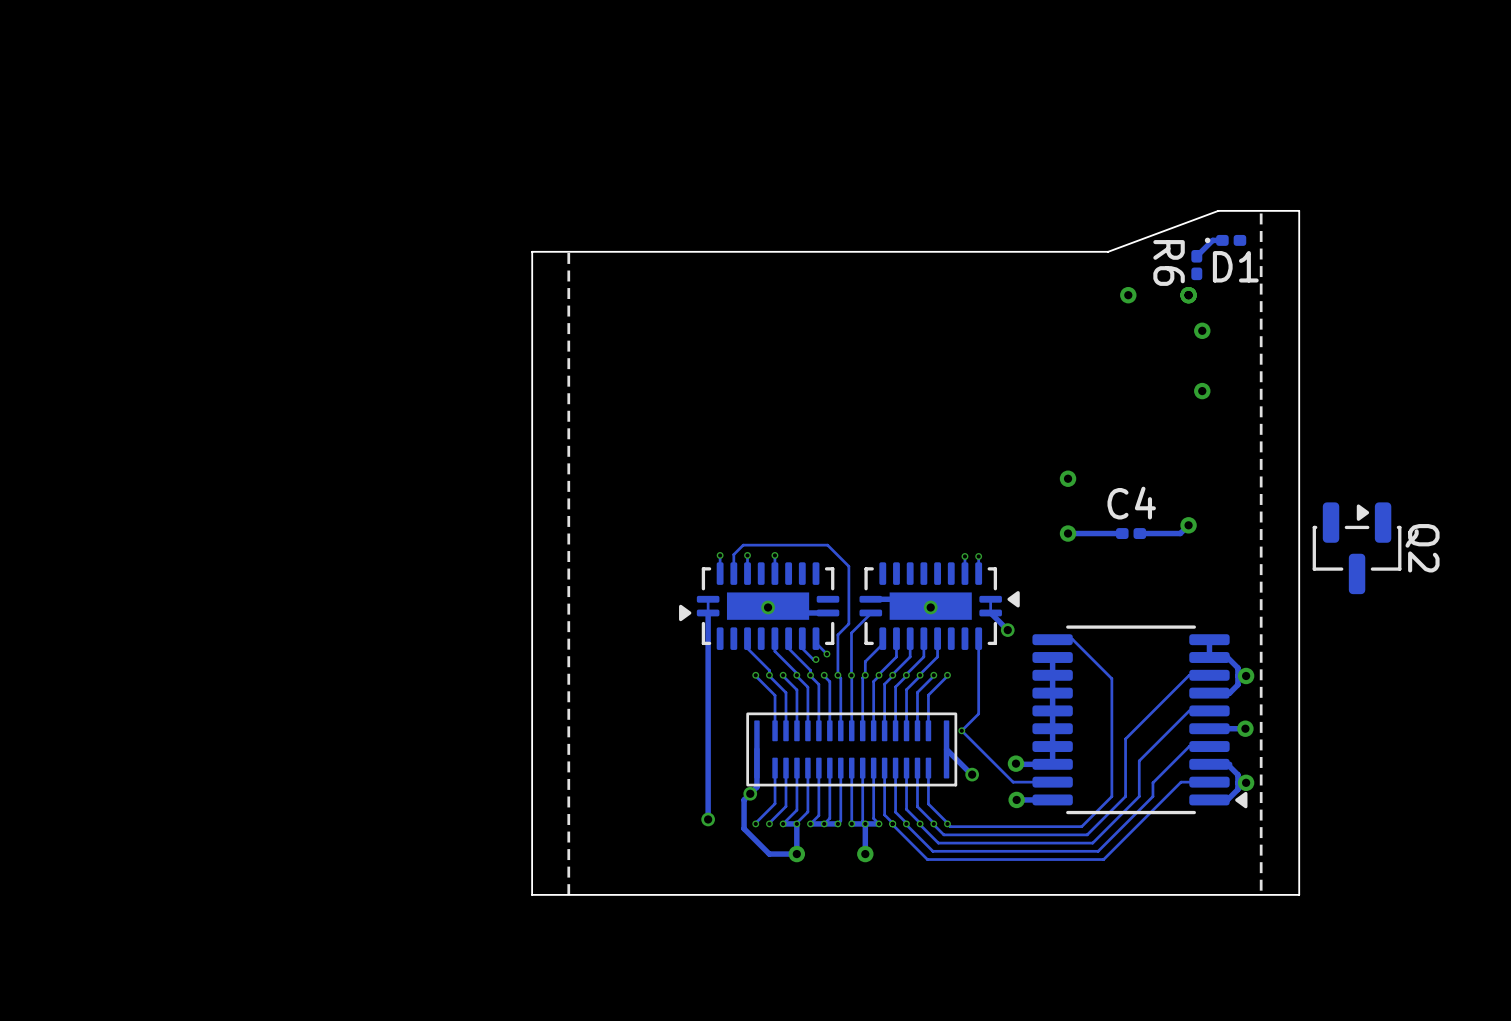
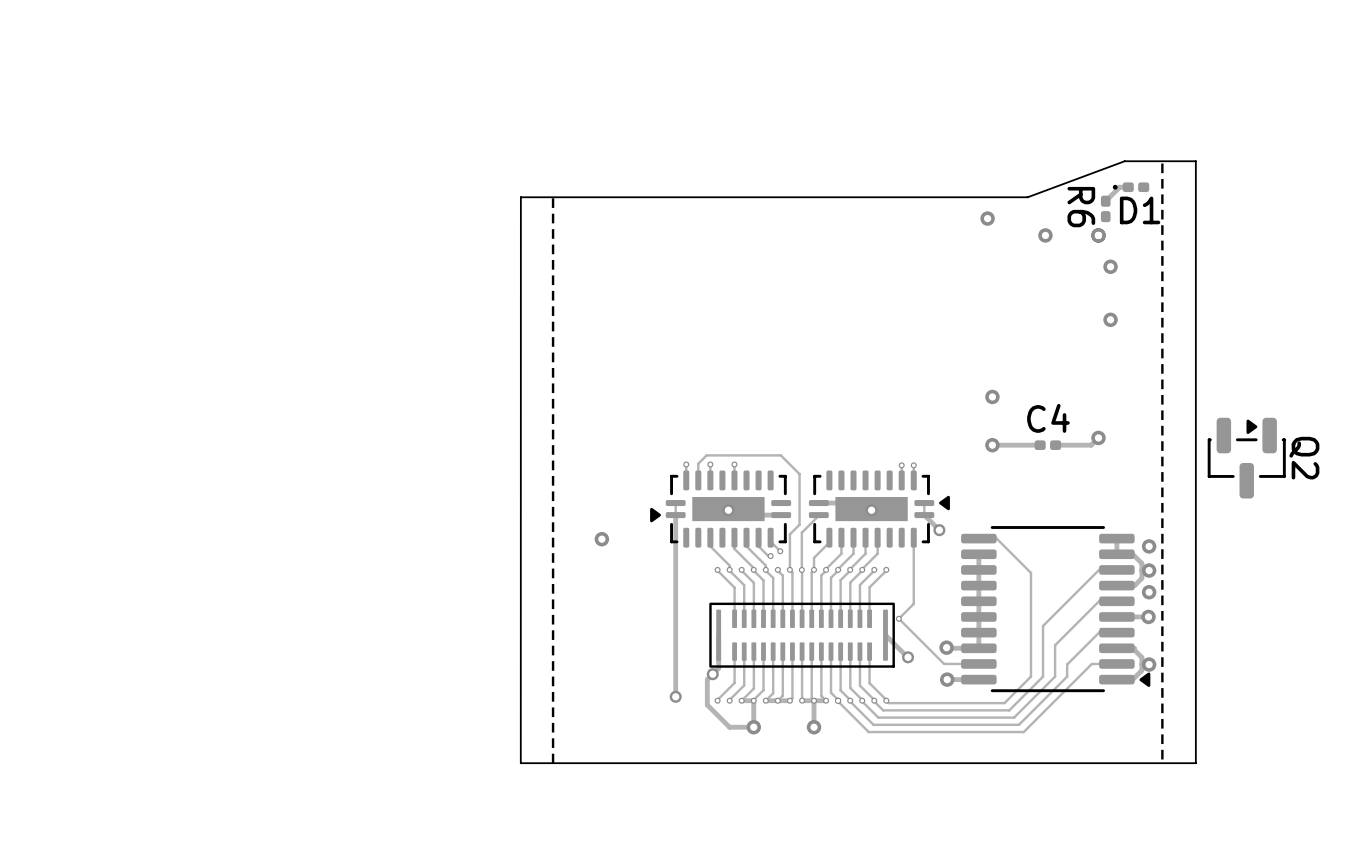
via: none -> (987, 218)
via: none -> (601, 539)
via: none -> (1149, 546)
via: none -> (1149, 592)

